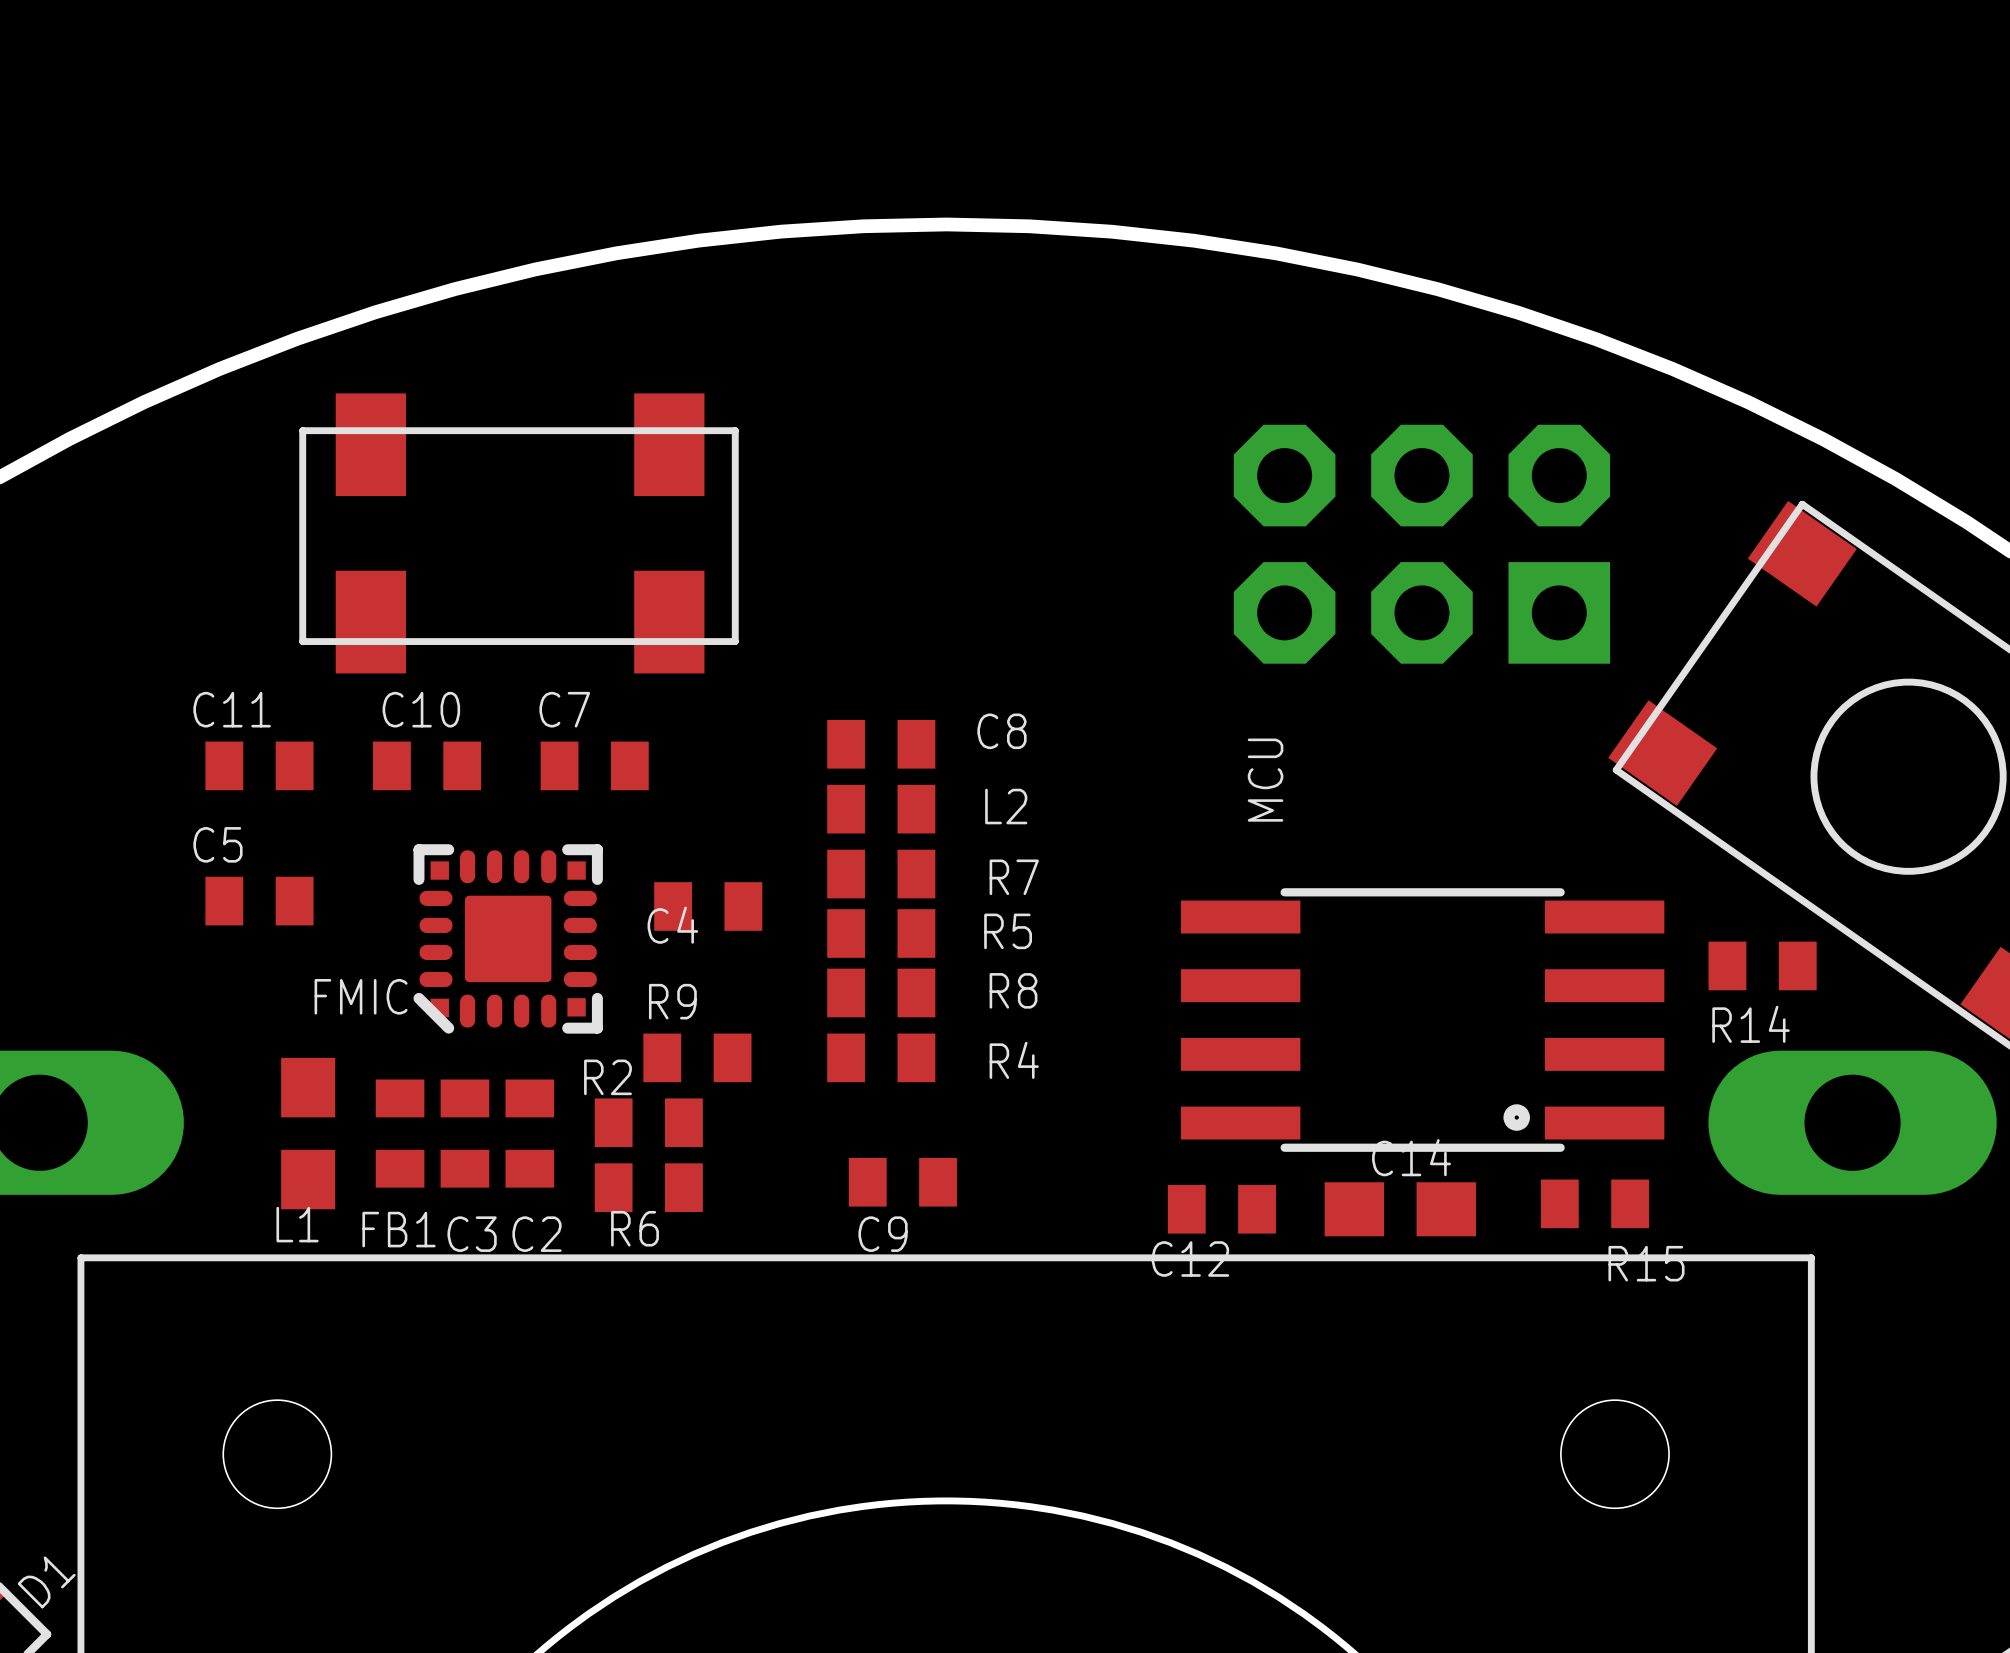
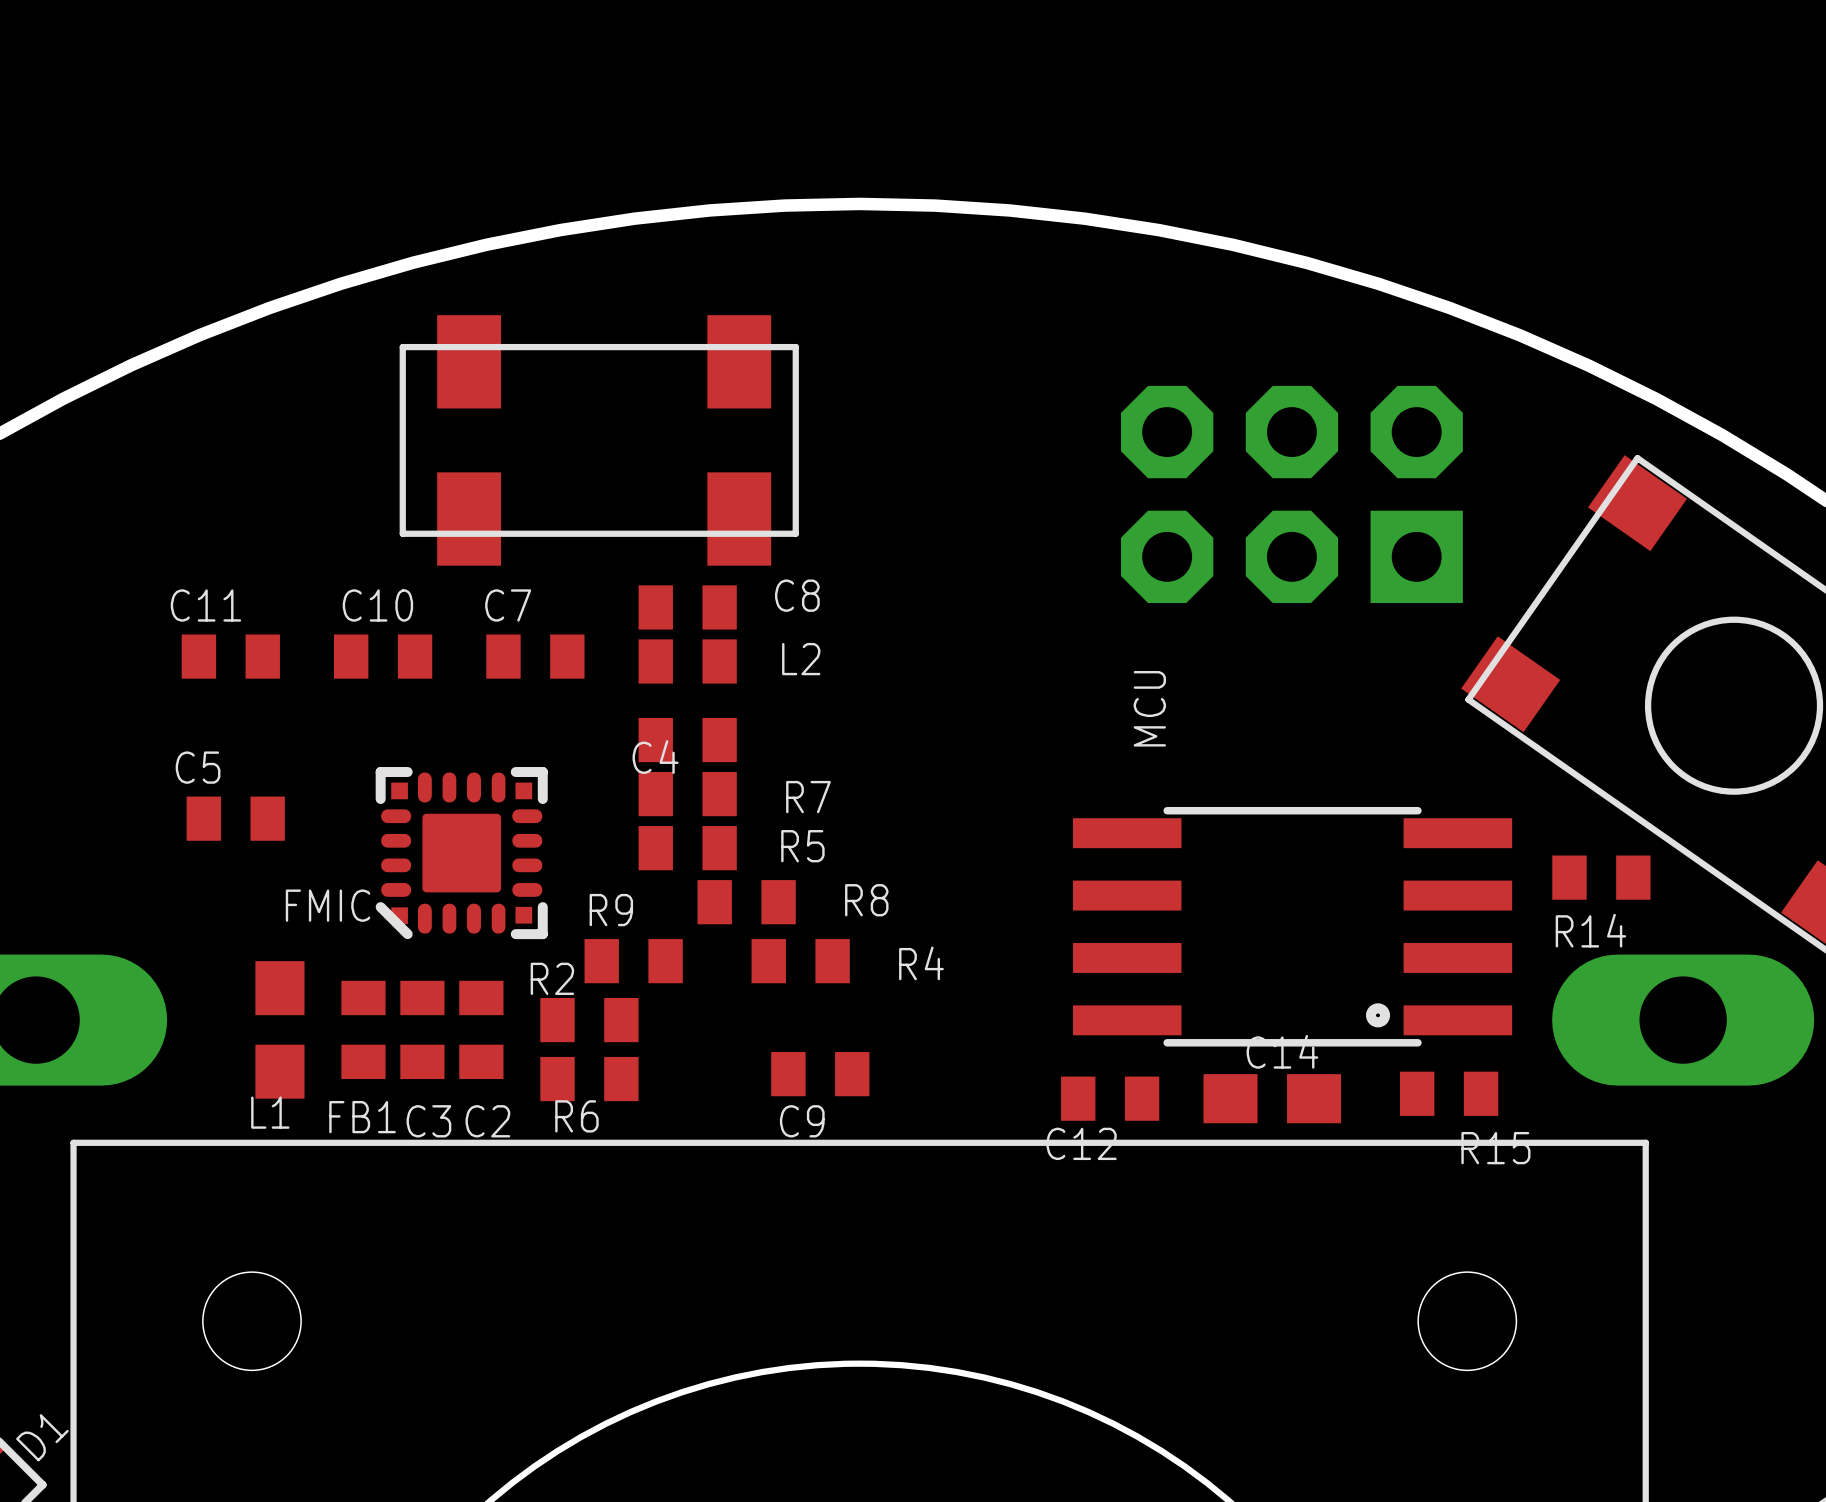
part: none -> (599, 440)
part: (519, 533) -> none
C8 position: (881, 744) -> (687, 607)
C11 position: (259, 765) -> (230, 656)
C10 position: (427, 765) -> (383, 656)
C7 position: (594, 765) -> (535, 656)
L2 position: (881, 809) -> (687, 661)
R7 position: (881, 874) -> (687, 794)
C4 position: (708, 906) -> (687, 740)
R5 position: (881, 933) -> (687, 848)
R8 position: (881, 993) -> (746, 902)

